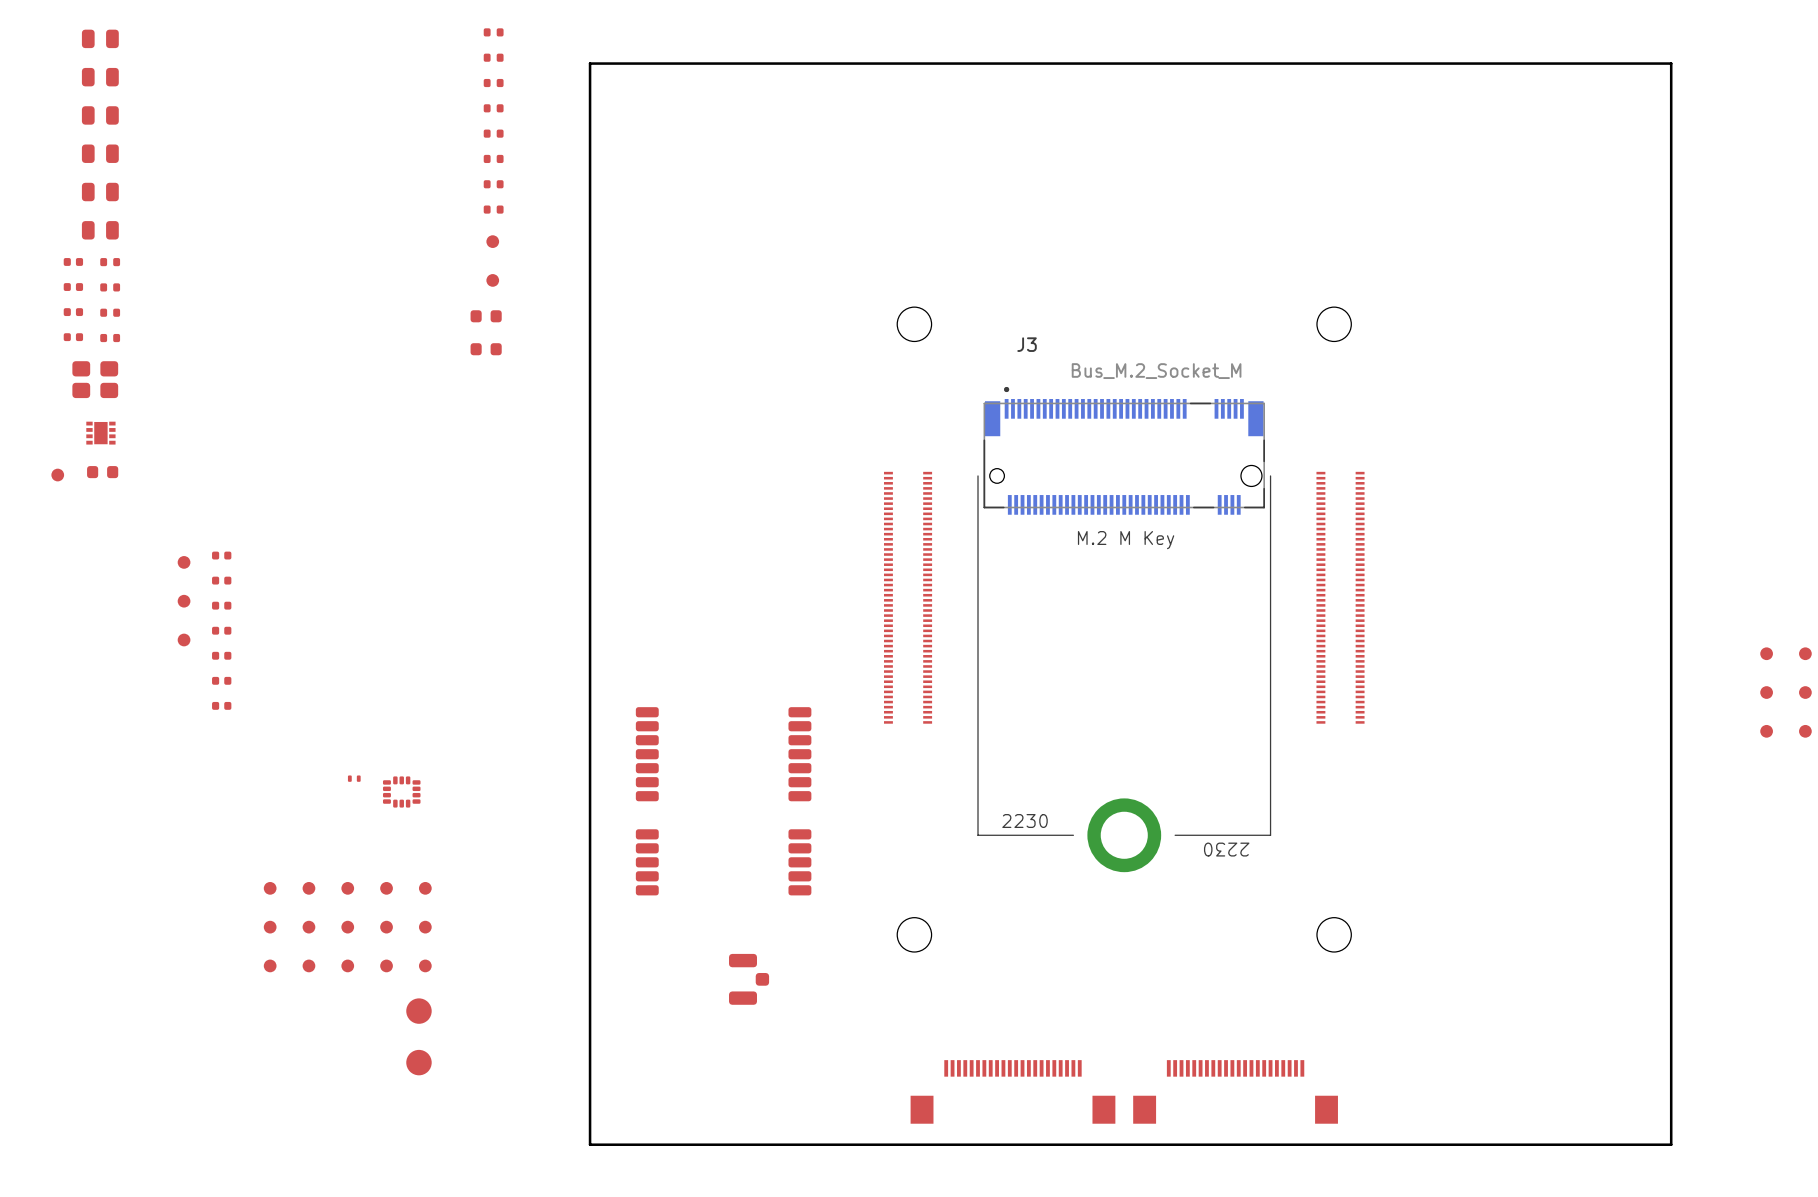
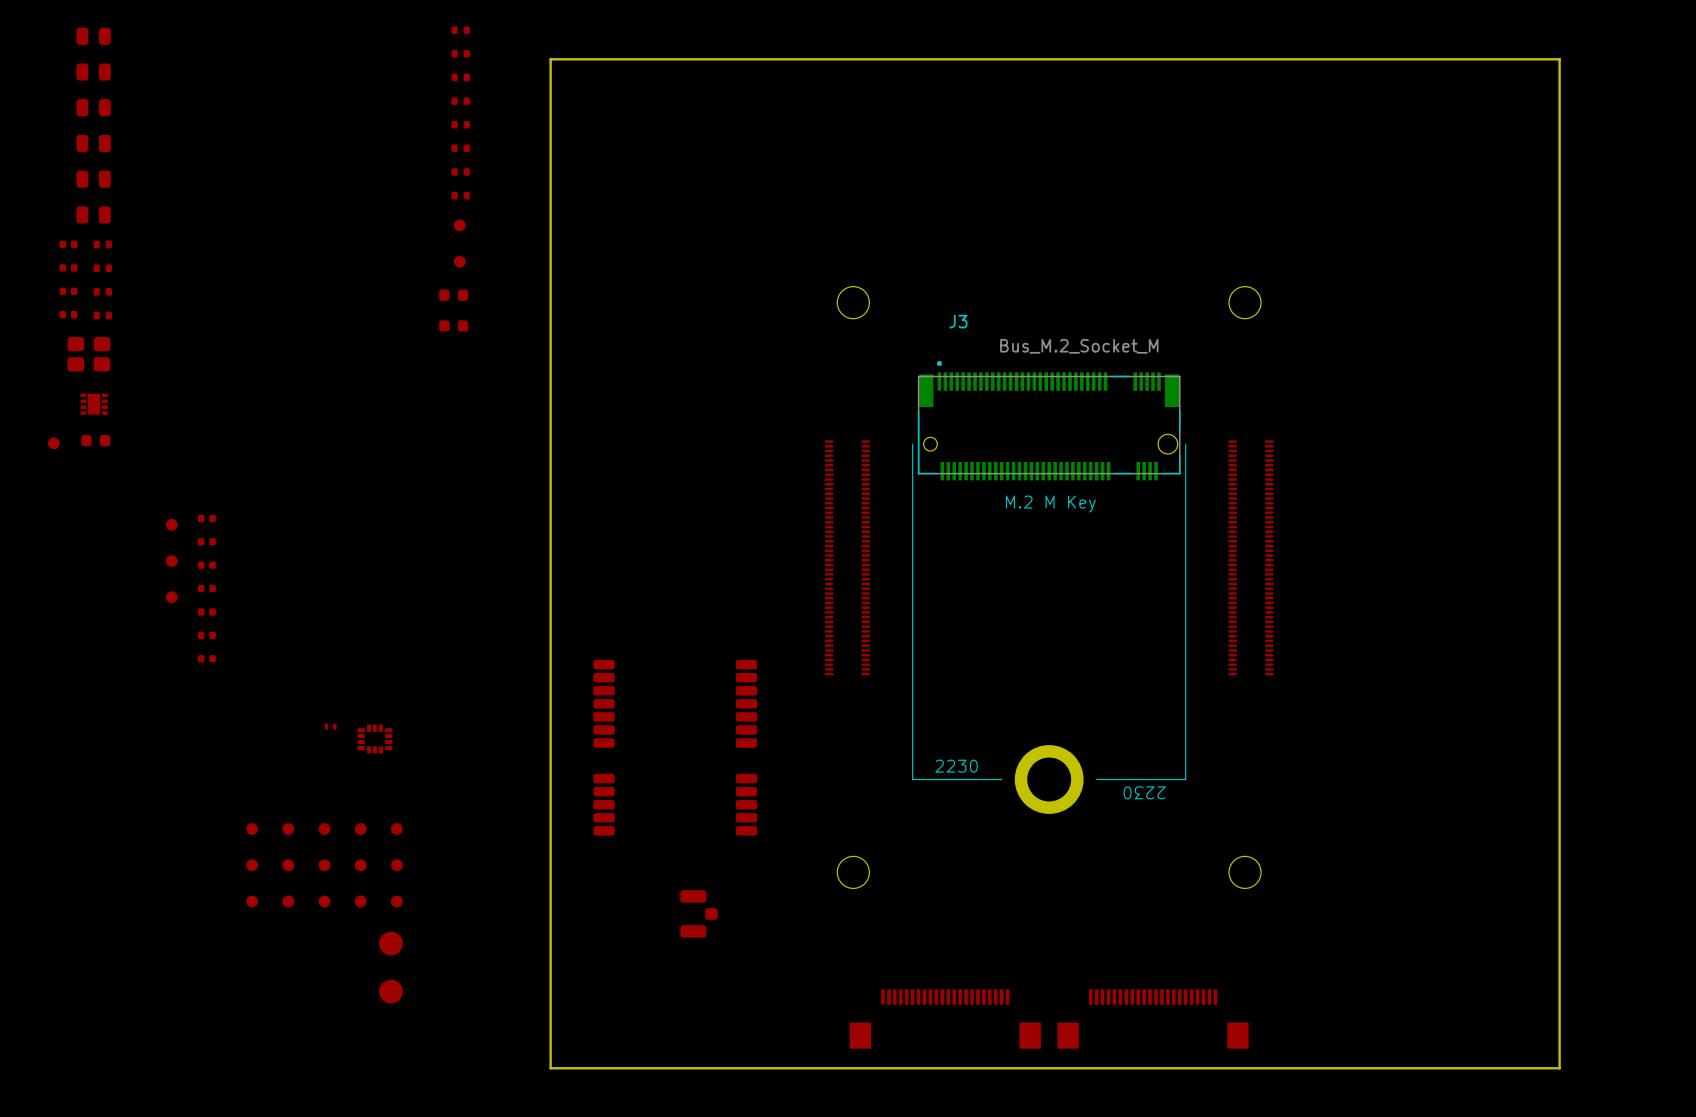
part: (1766, 653) -> none
part: (1805, 653) -> none
part: (1766, 692) -> none
part: (1805, 692) -> none
part: (1766, 731) -> none
part: (1805, 731) -> none

